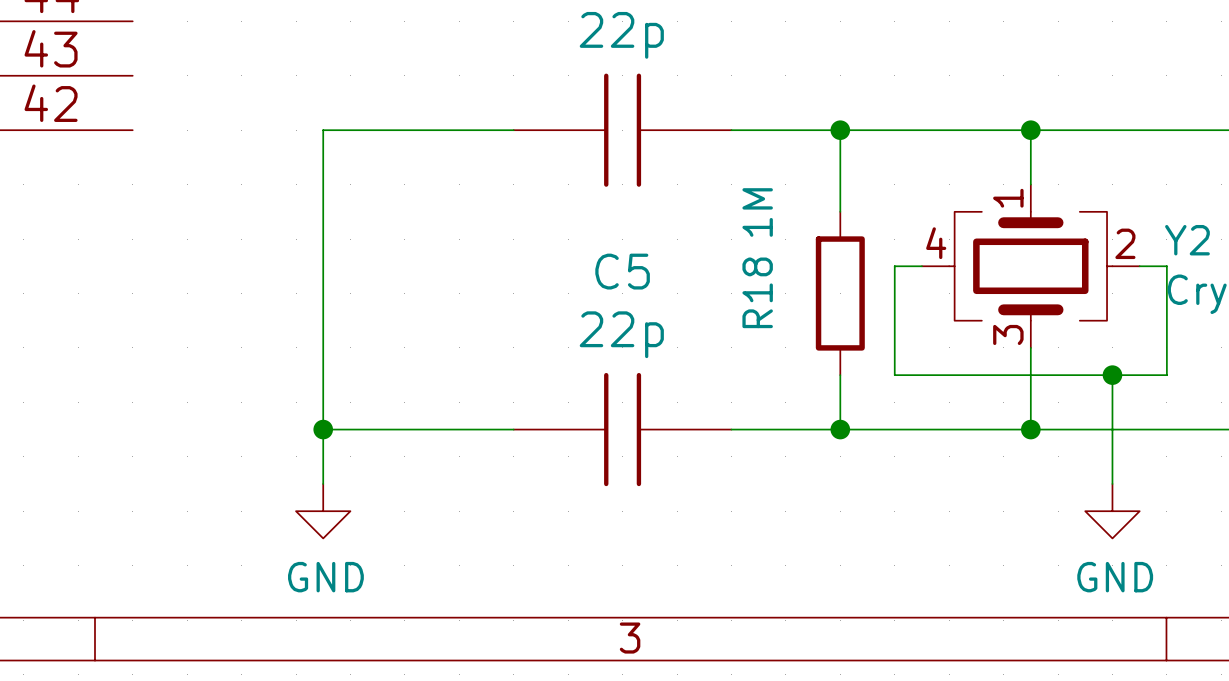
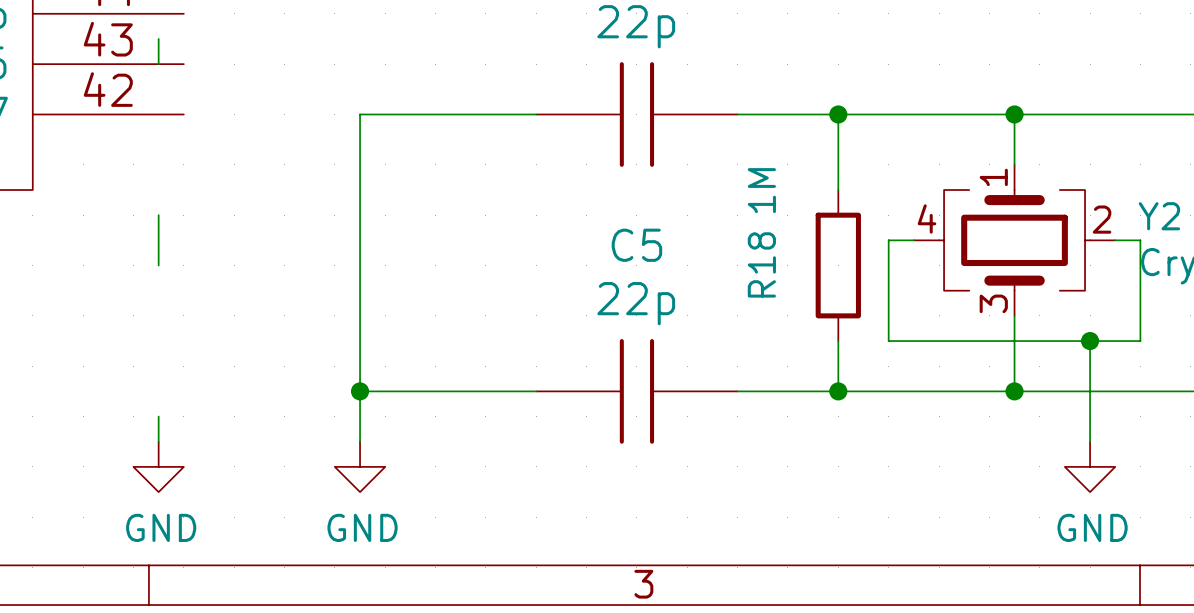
wire: none -> (158, 38) (158, 64)
wire: none -> (158, 215) (158, 265)
wire: none -> (158, 416) (158, 441)
power symbol: none -> GND (158, 466)

